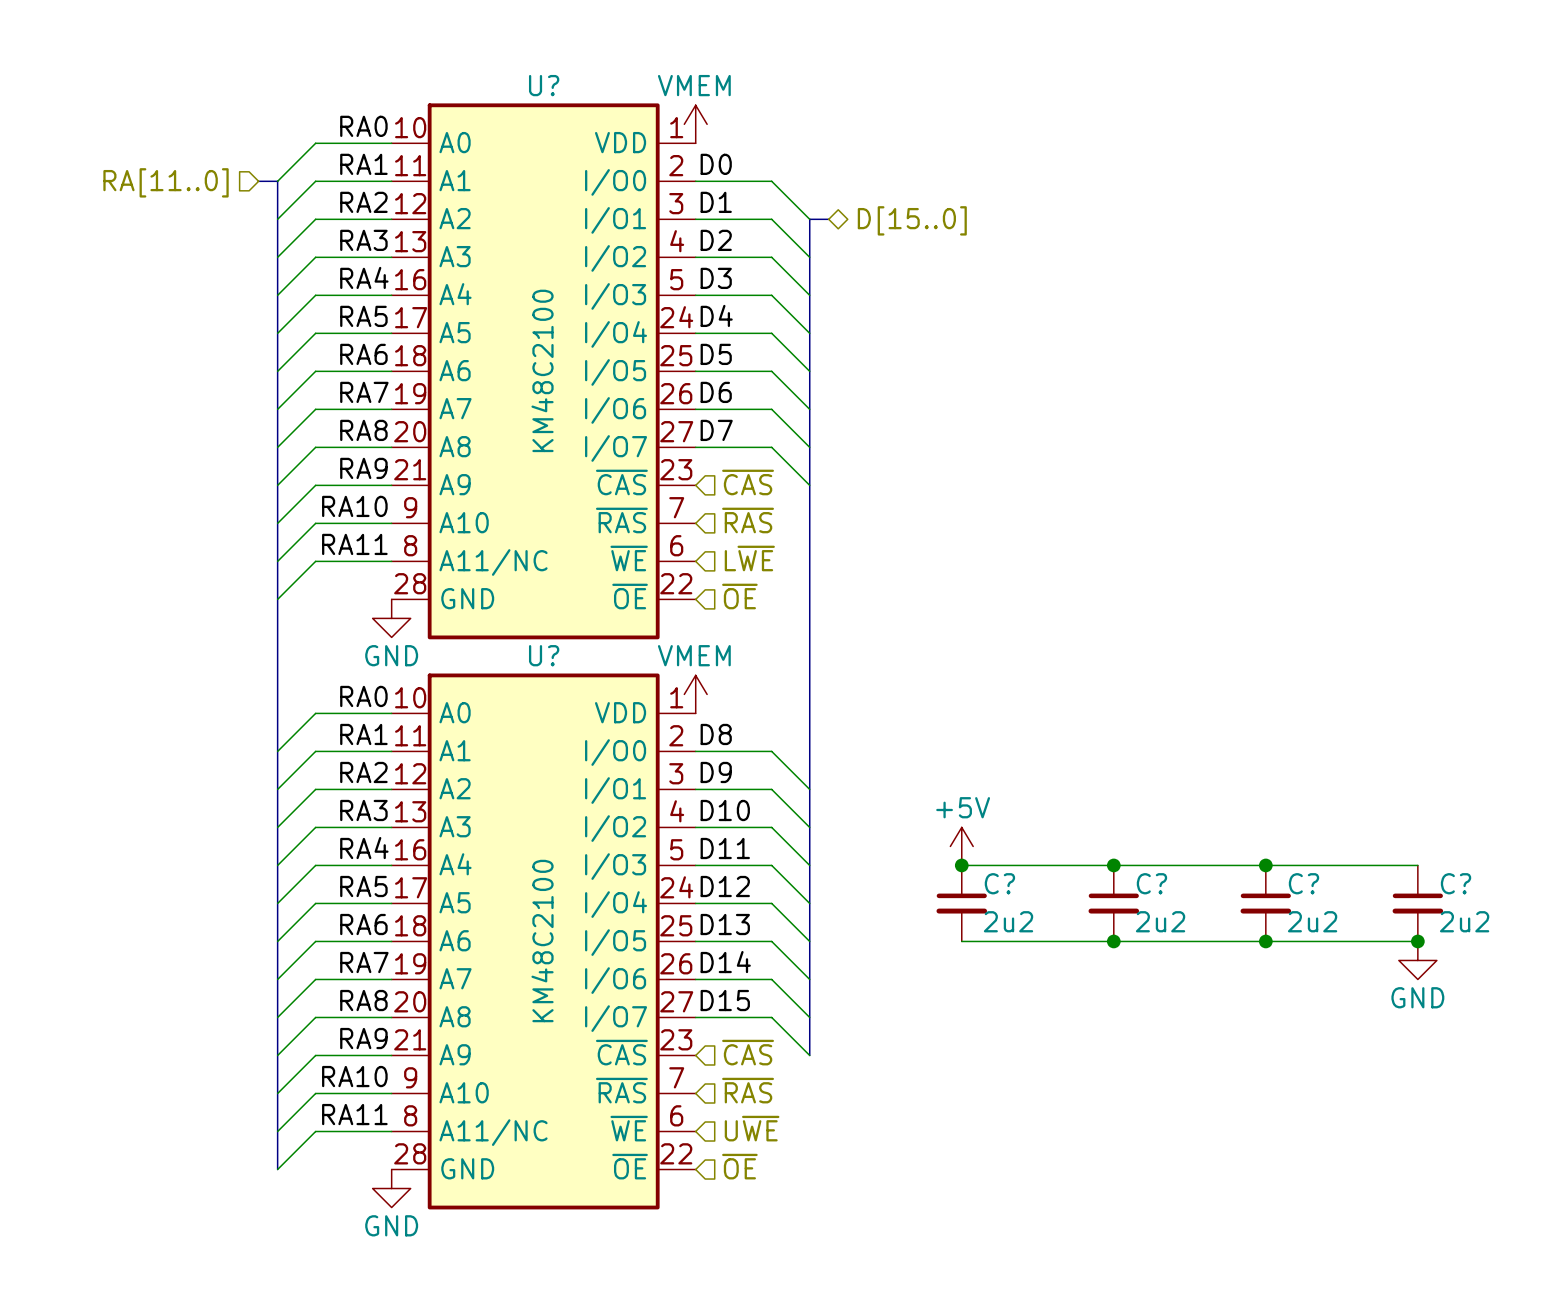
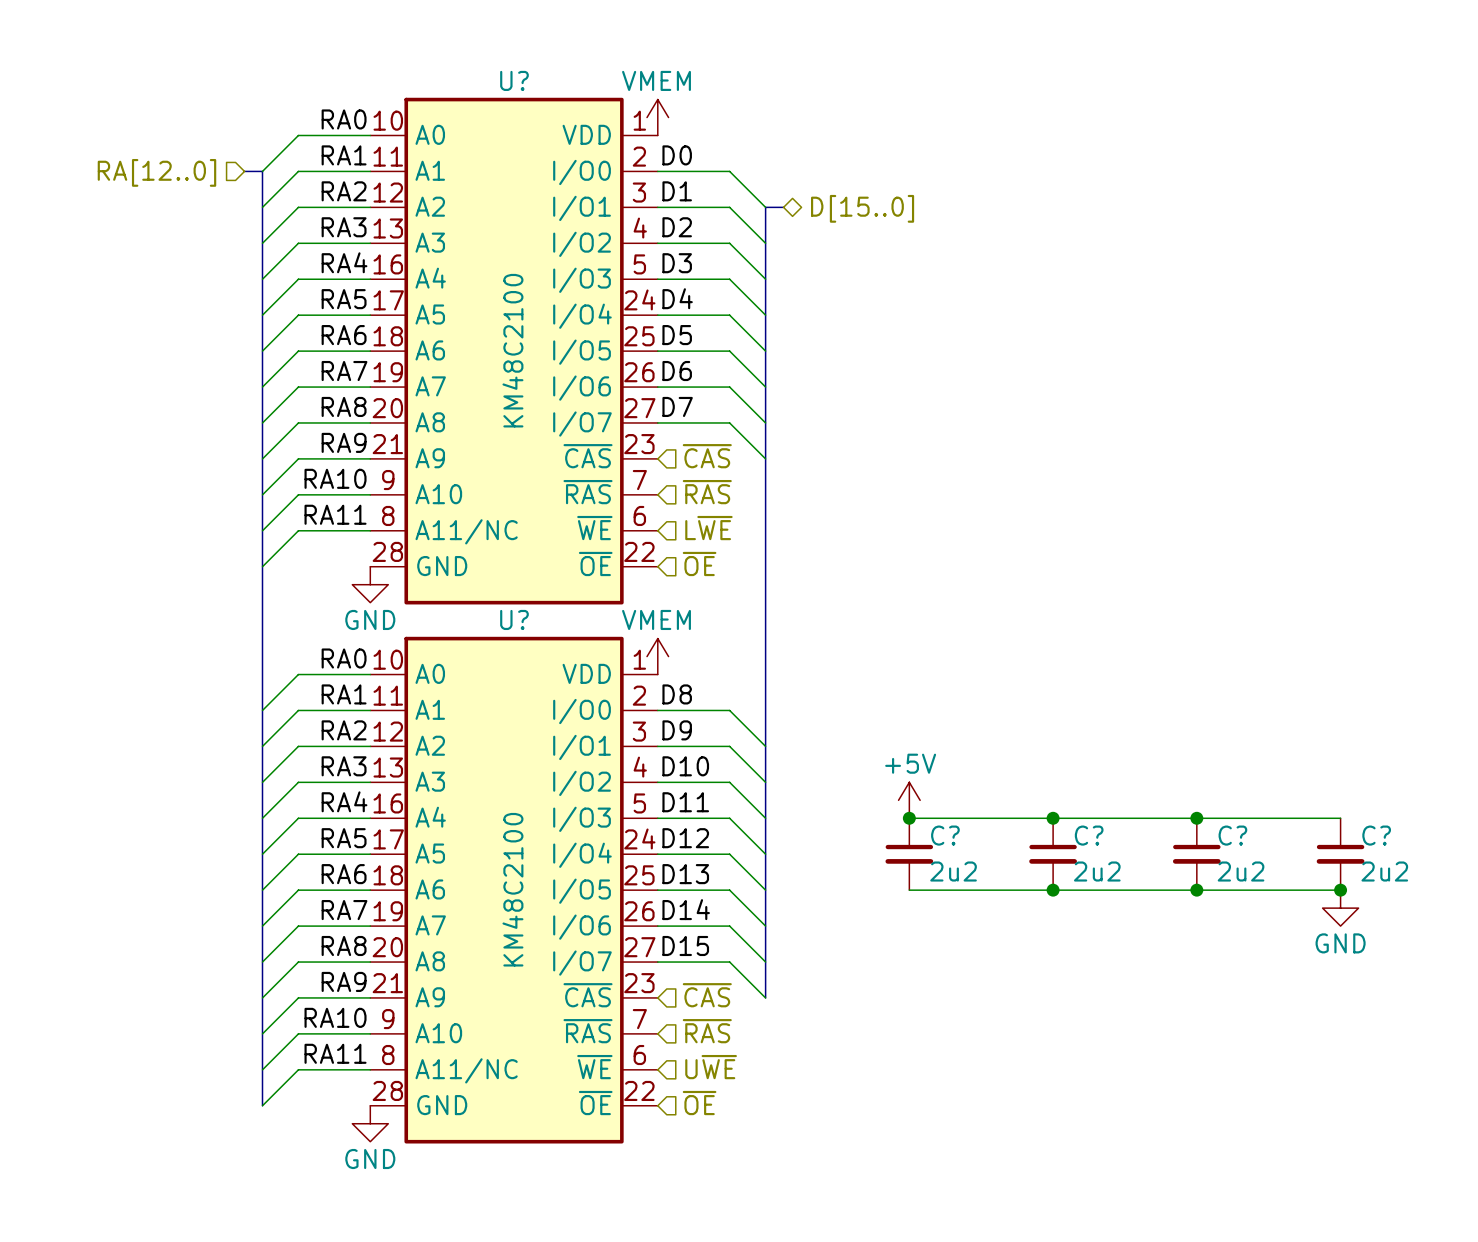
hierarchical label: RA[11..0] (166, 182) -> RA[12..0] (156, 172)

